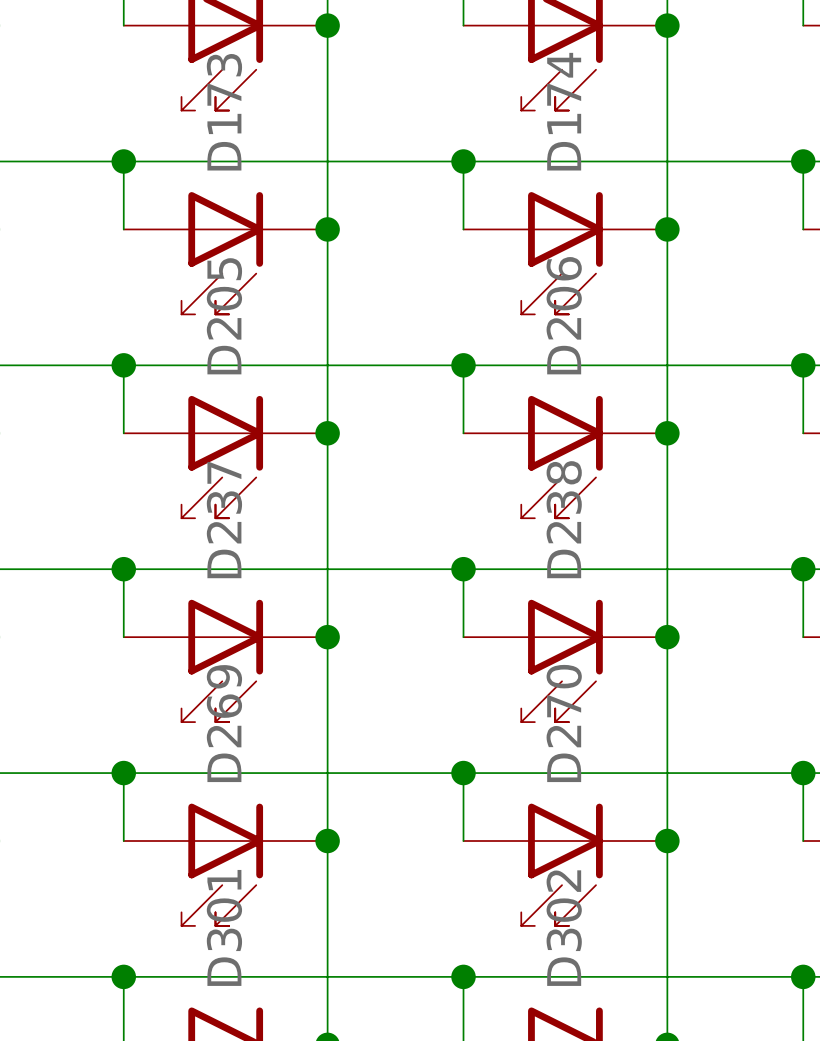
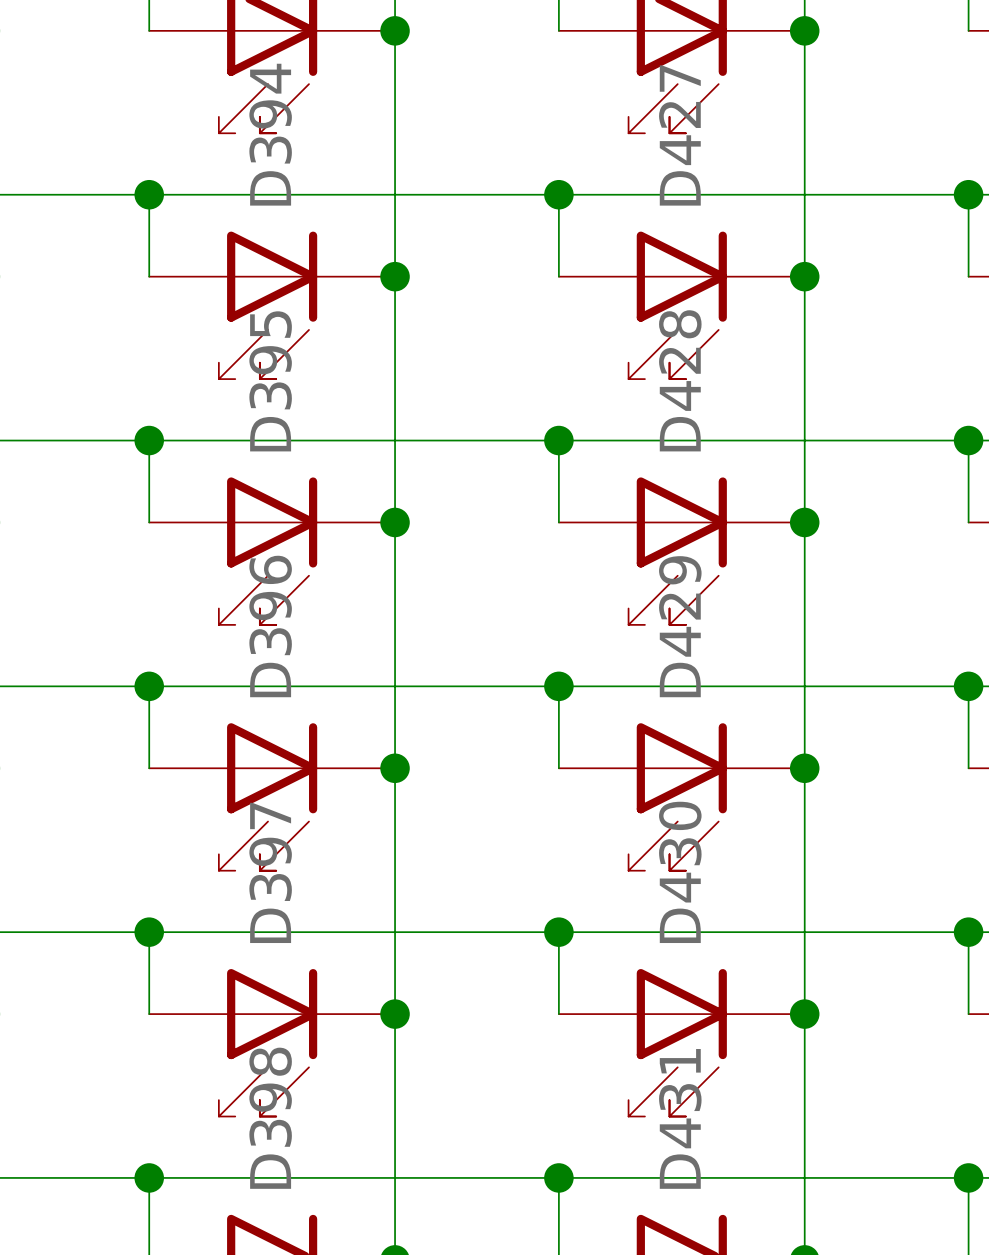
D174 name: D174 (564, 111) -> D427 (679, 135)
D173 name: D173 (224, 112) -> D394 (270, 134)
D206 name: D206 (564, 315) -> D428 (680, 380)
D205 name: D205 (224, 316) -> D395 (270, 381)
D238 name: D238 (564, 519) -> D429 (680, 626)
D237 name: D237 (224, 520) -> D396 (270, 626)
D269 name: D269 (224, 723) -> D397 (270, 872)
D270 name: D270 (564, 723) -> D430 (680, 872)
D301 name: D301 (224, 927) -> D398 (270, 1118)
D302 name: D302 (564, 928) -> D431 (680, 1118)

